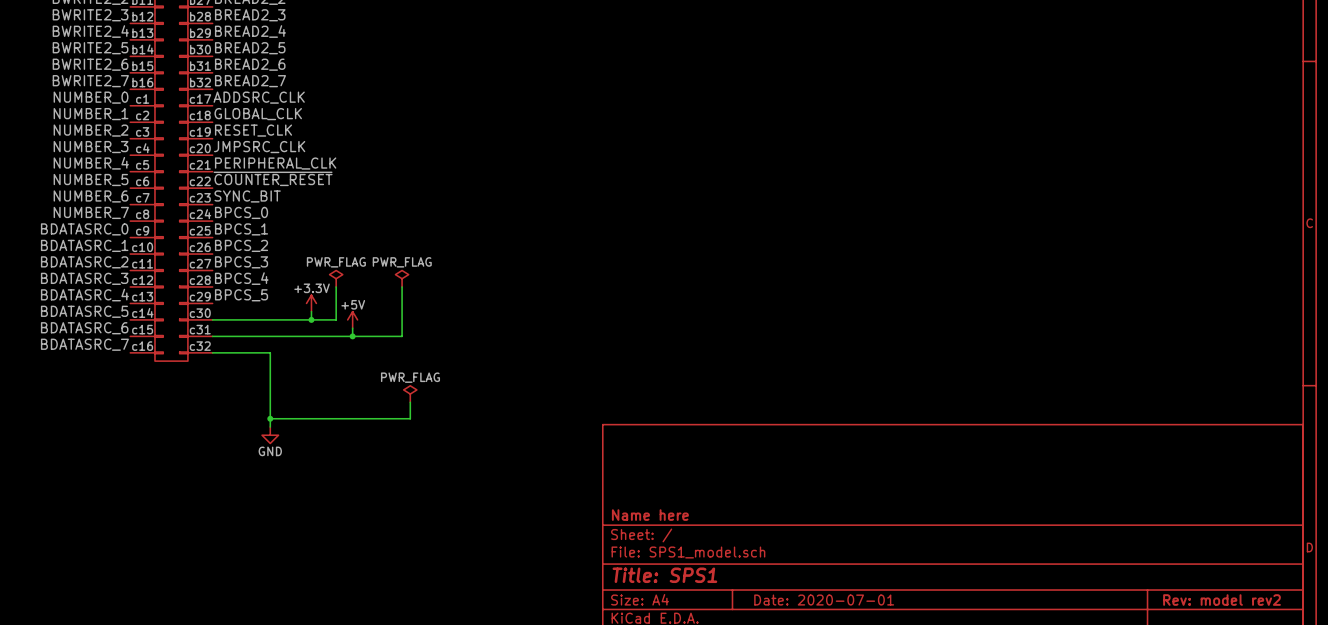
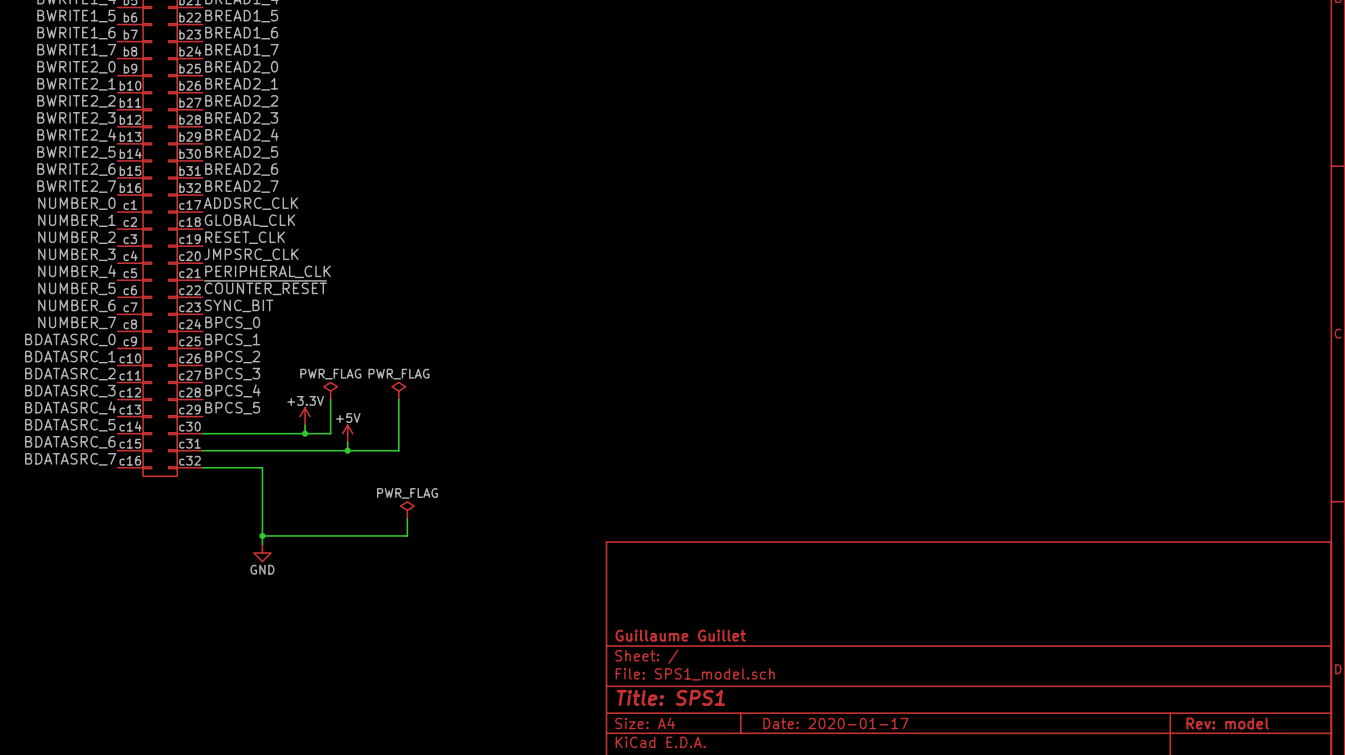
title block: Name here (650, 515) -> Guillaume Guillet (680, 635)
title block: Date: 2020-07-01 (824, 600) -> Date: 2020-01-17 (835, 723)
title block: Rev: model rev2 (1222, 600) -> Rev: model (1227, 723)

